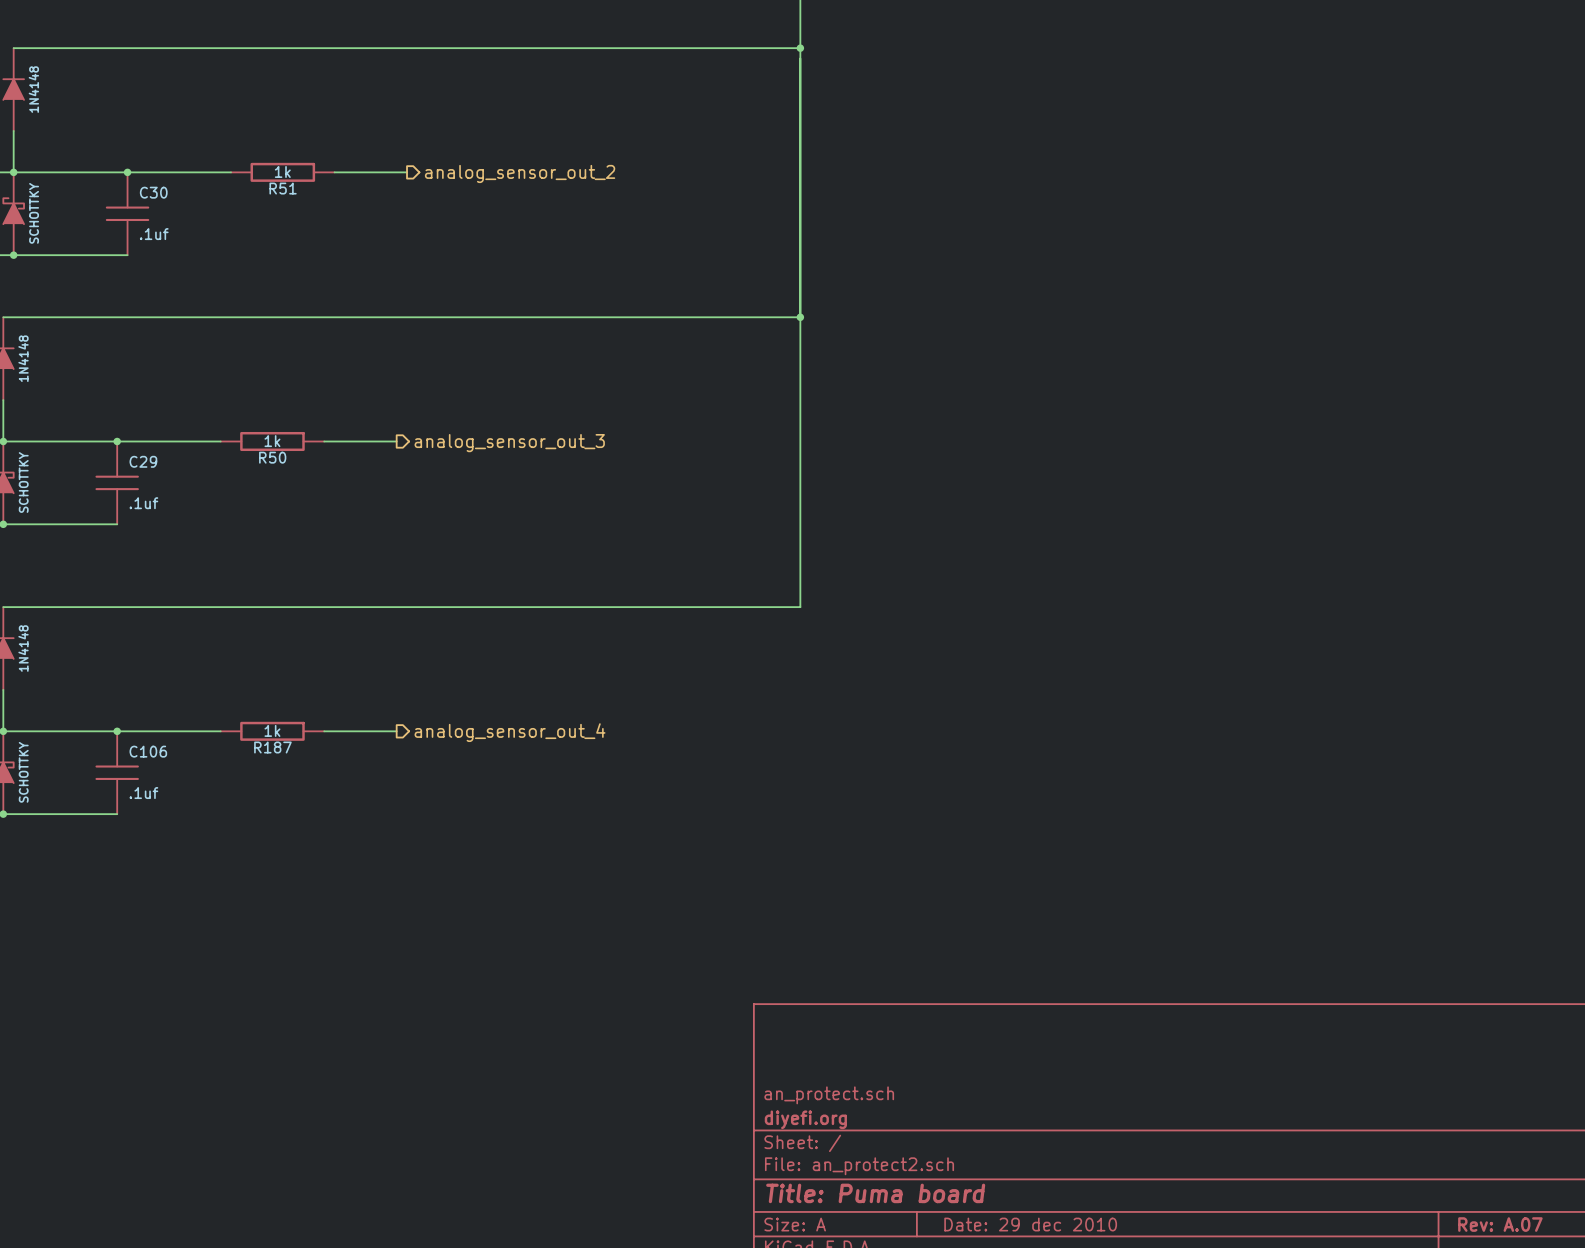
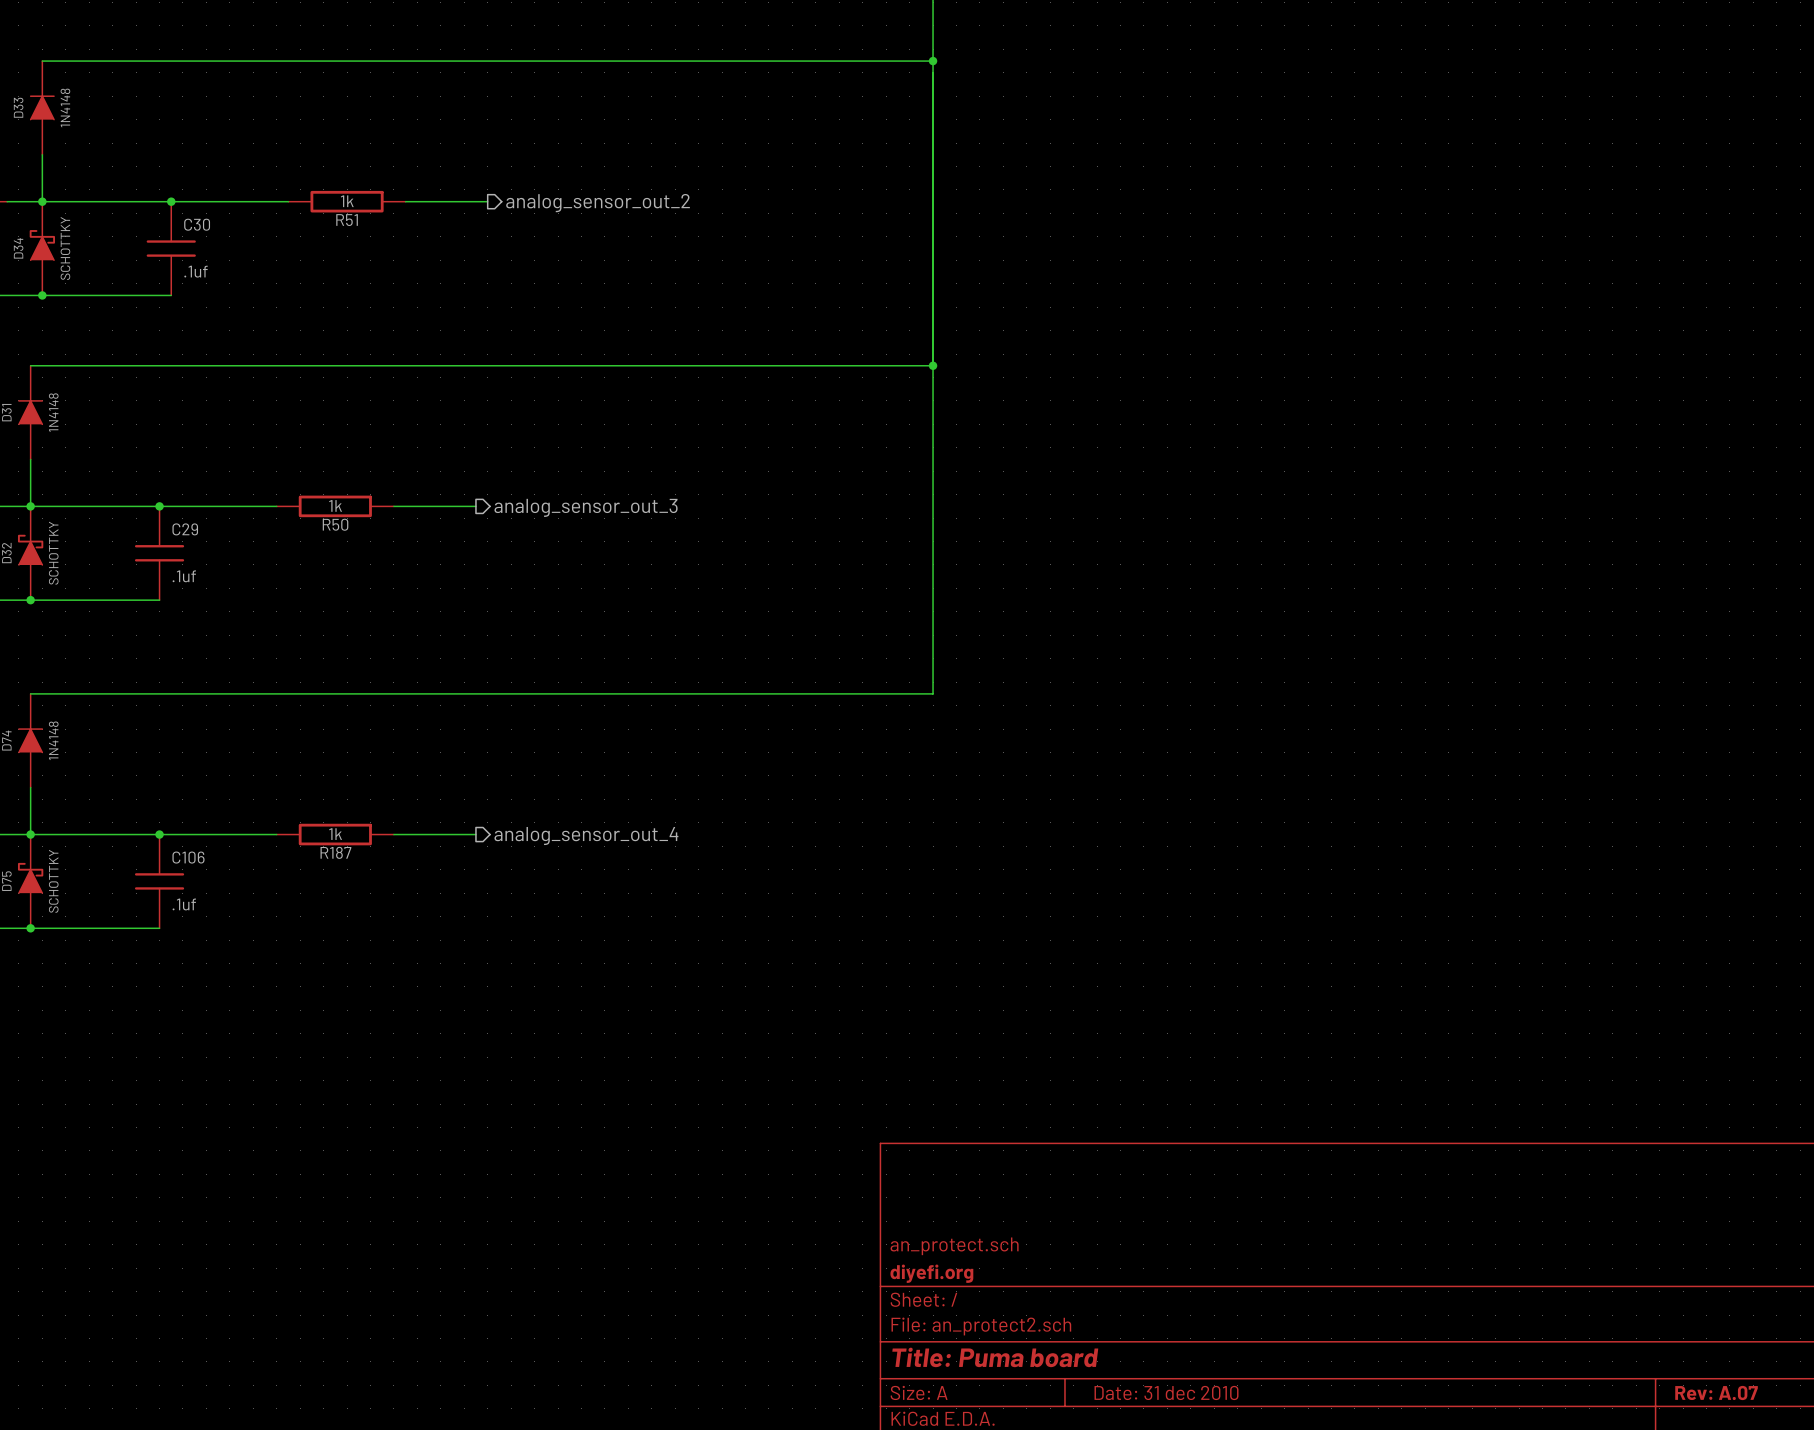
title block: Date: 29 dec 2010 (1030, 1224) -> Date: 31 dec 2010 (1166, 1392)

